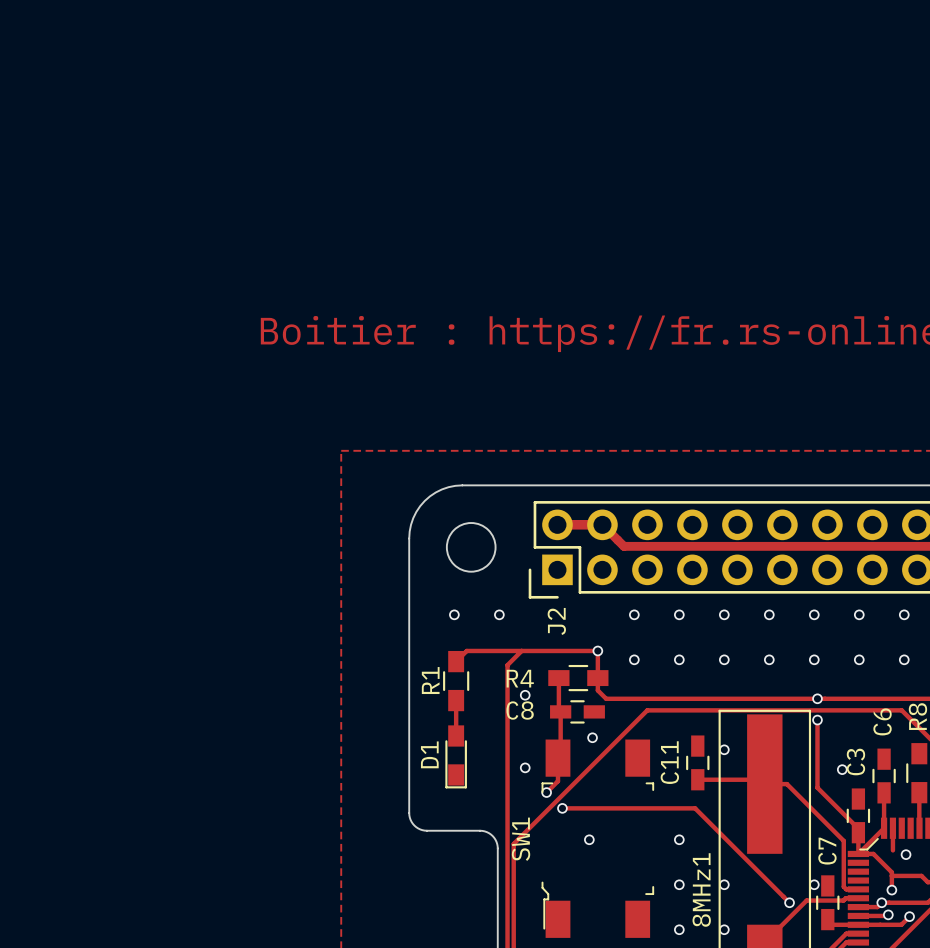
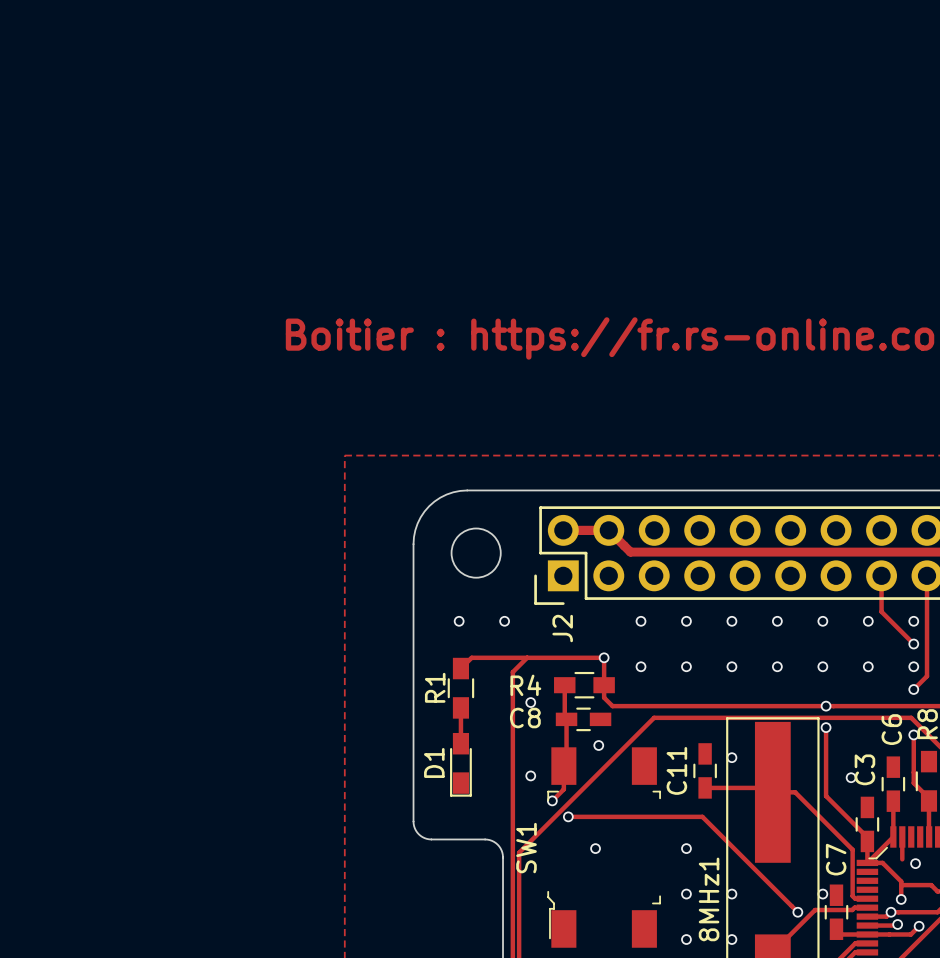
track: none -> (881, 575) (881, 611) (913, 644)
track: none -> (927, 575) (927, 676) (913, 689)
via: none -> (913, 644)
via: none -> (913, 689)
track: none -> (913, 734) (913, 783) (928, 798) (928, 800)
via: none -> (913, 734)

